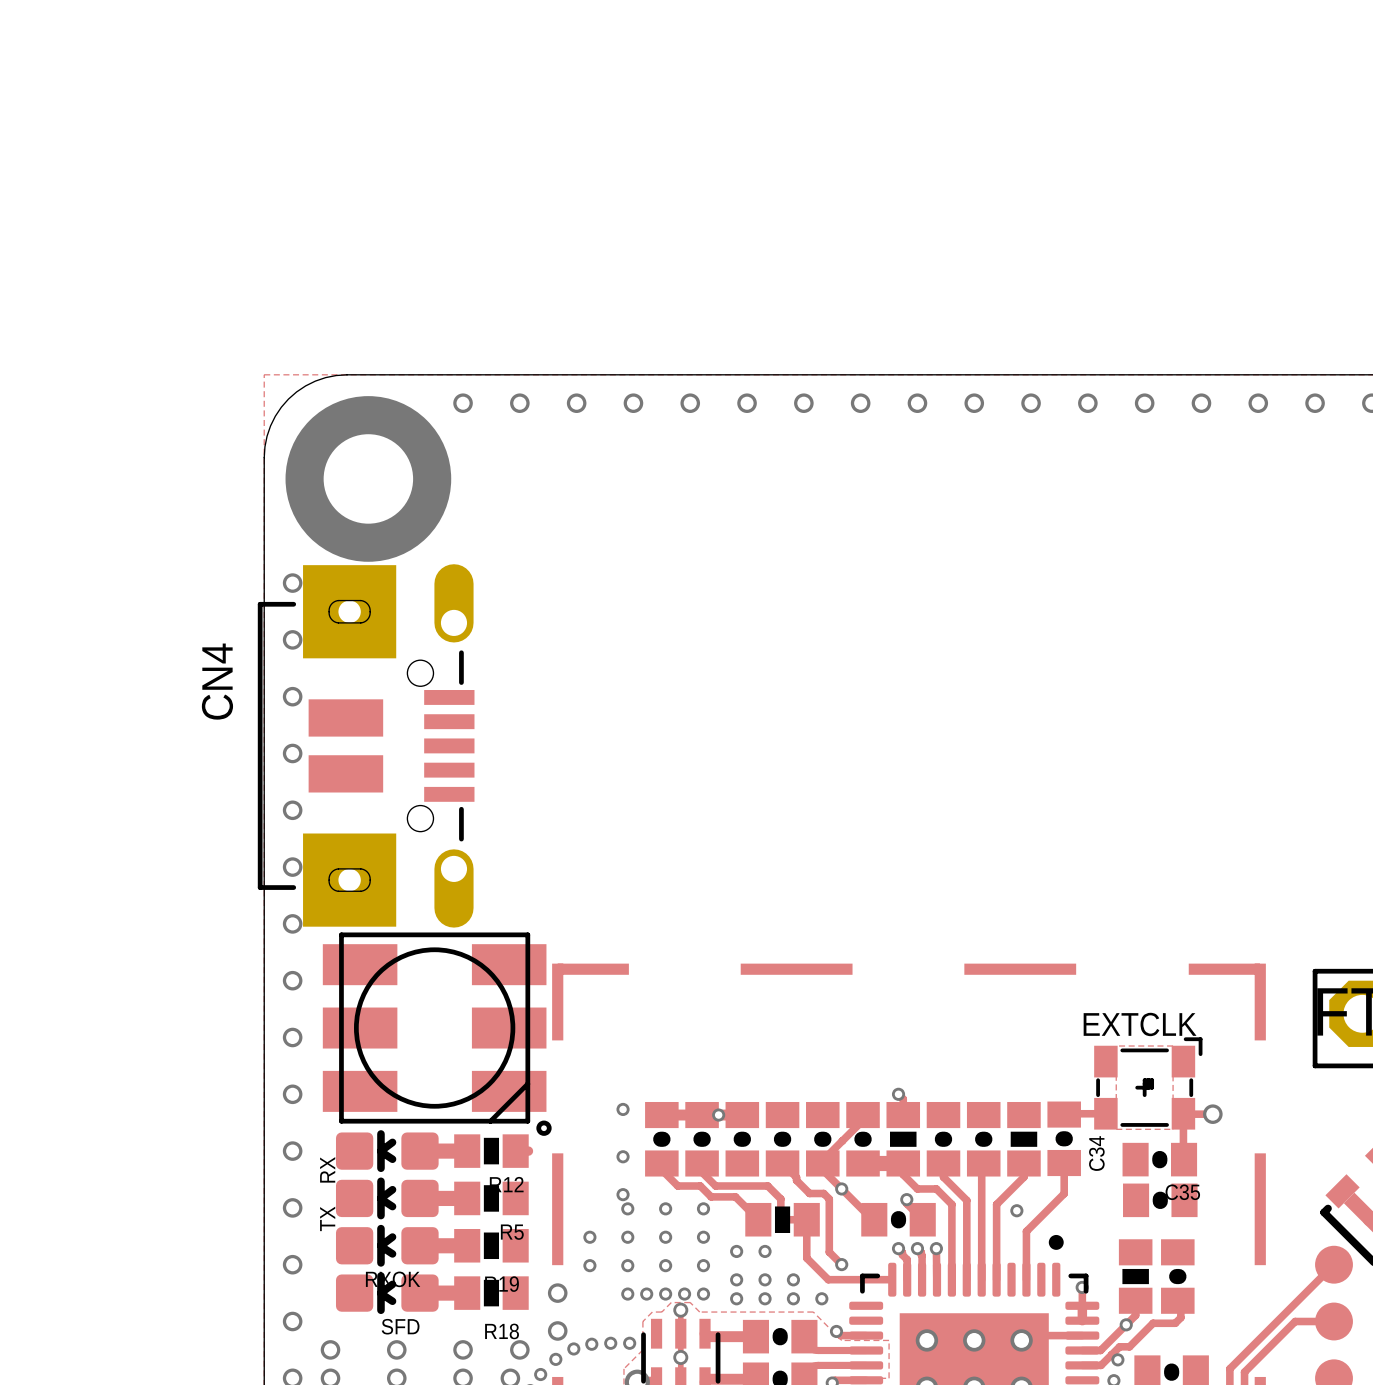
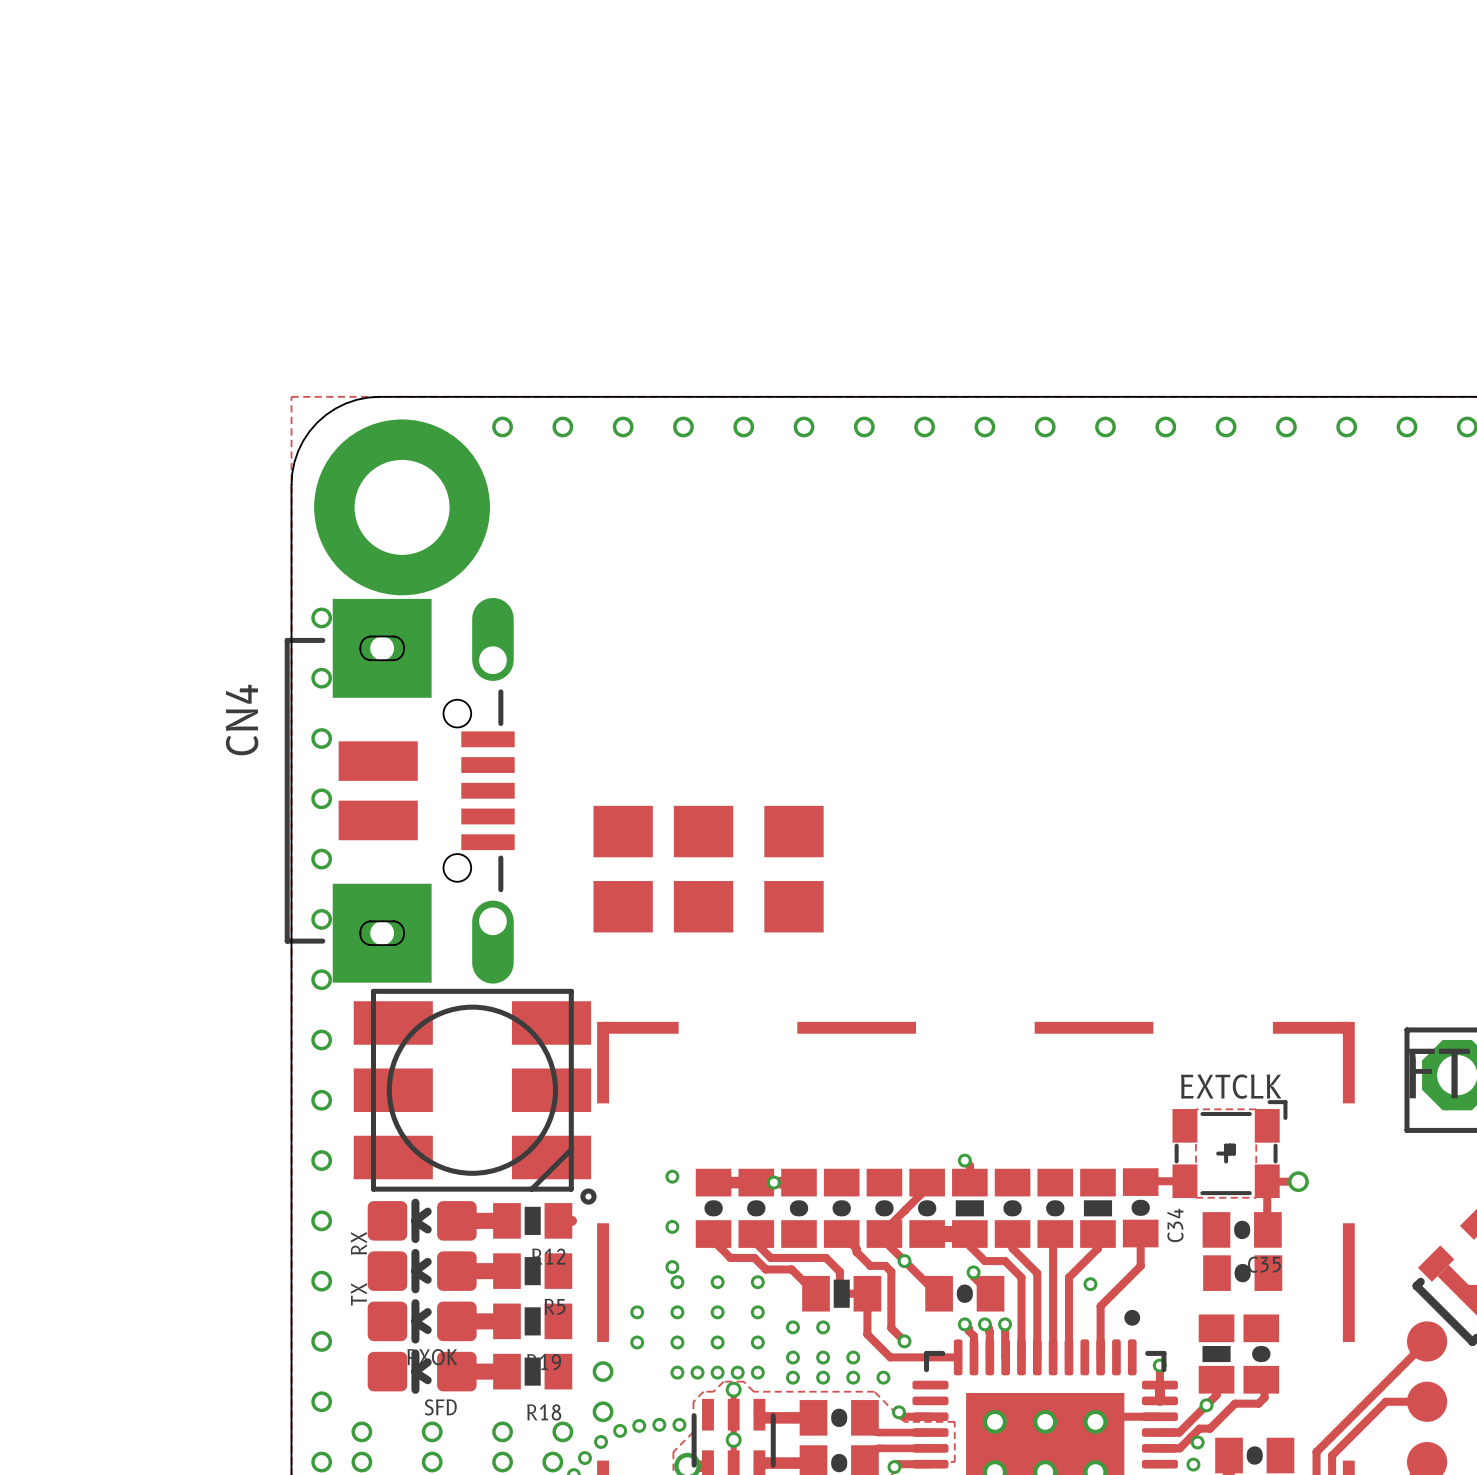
part: none -> (623, 869)
part: none -> (703, 869)
part: none -> (793, 869)

